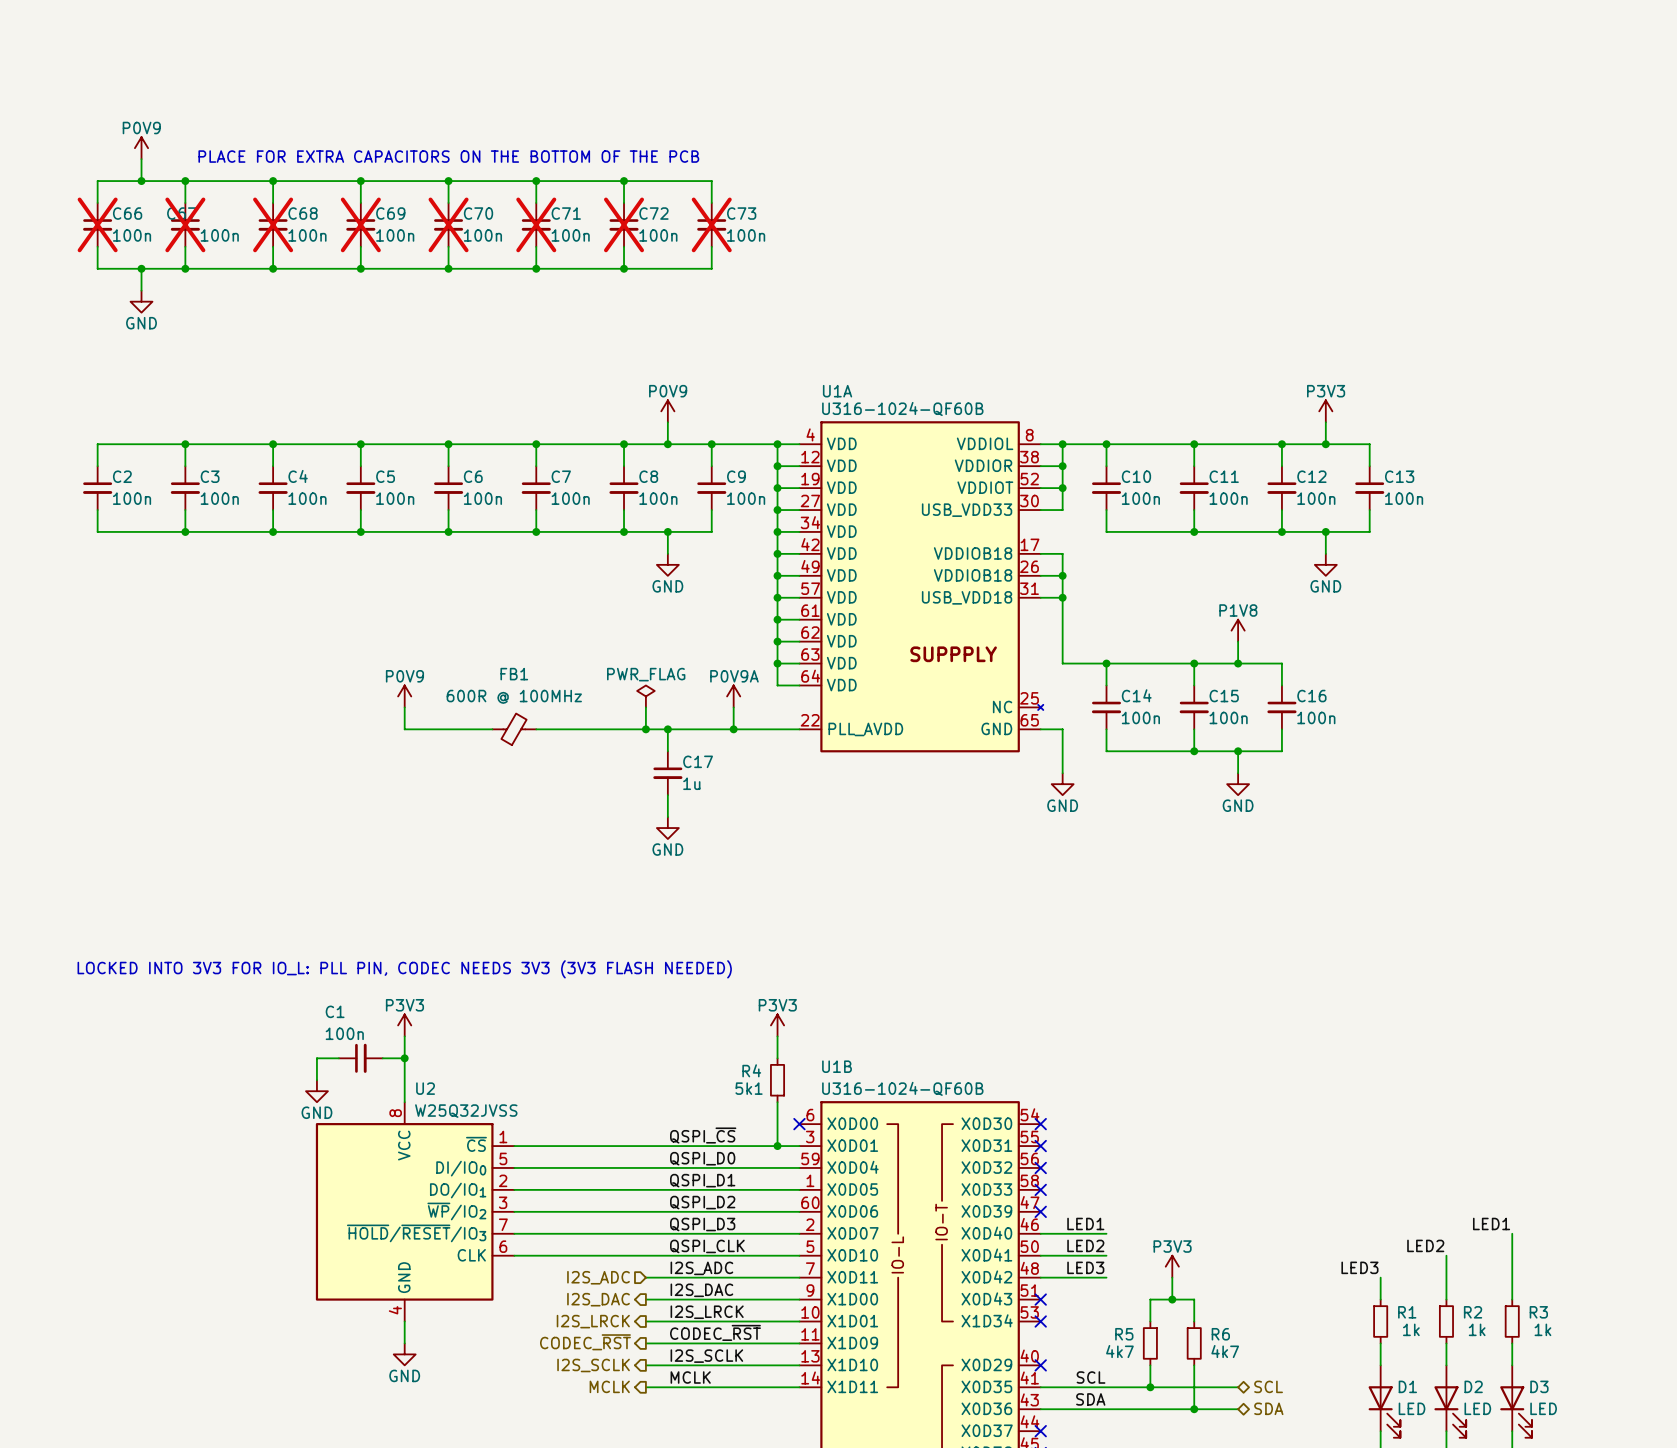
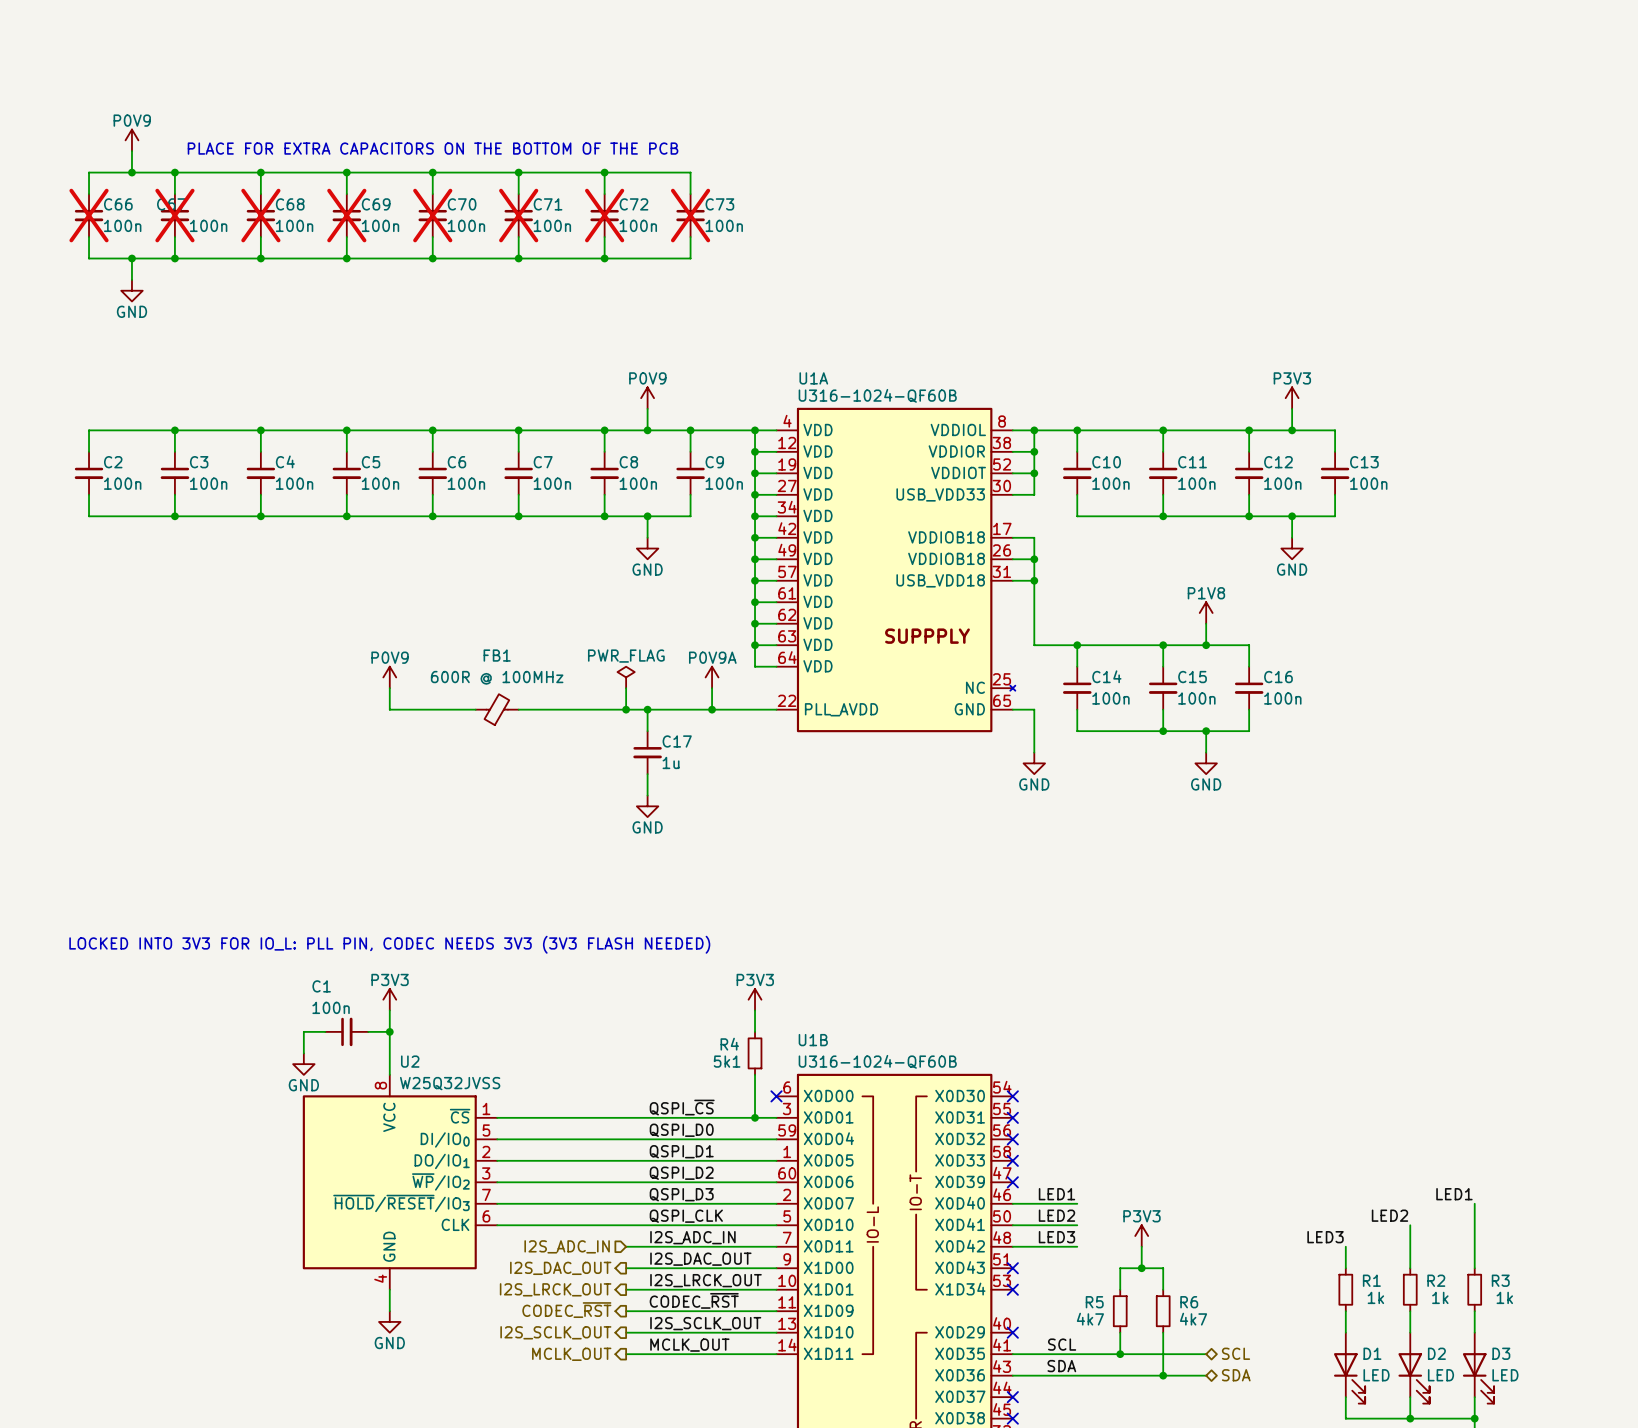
label: I2S_ADC (701, 1268) -> I2S_ADC_IN (692, 1237)
hierarchical label: I2S_ADC (598, 1277) -> I2S_ADC_IN (567, 1246)
label: I2S_DAC (701, 1290) -> I2S_DAC_OUT (700, 1259)
hierarchical label: I2S_DAC (598, 1299) -> I2S_DAC_OUT (560, 1268)
label: I2S_LRCK (707, 1312) -> I2S_LRCK_OUT (705, 1280)
hierarchical label: I2S_LRCK (593, 1321) -> I2S_LRCK_OUT (555, 1289)
label: I2S_SCLK (706, 1356) -> I2S_SCLK_OUT (705, 1323)
hierarchical label: I2S_SCLK (593, 1365) -> I2S_SCLK_OUT (555, 1332)
label: MCLK (690, 1377) -> MCLK_OUT (689, 1345)
hierarchical label: MCLK (609, 1386) -> MCLK_OUT (571, 1354)

